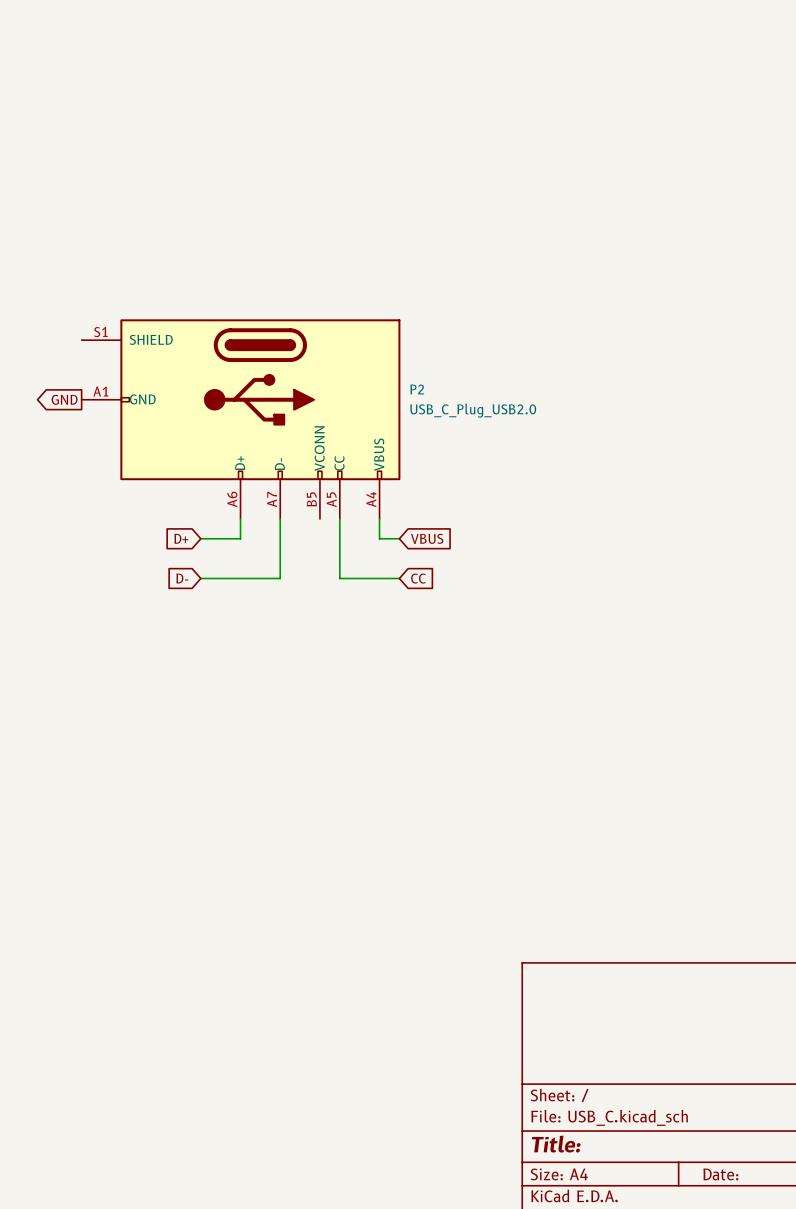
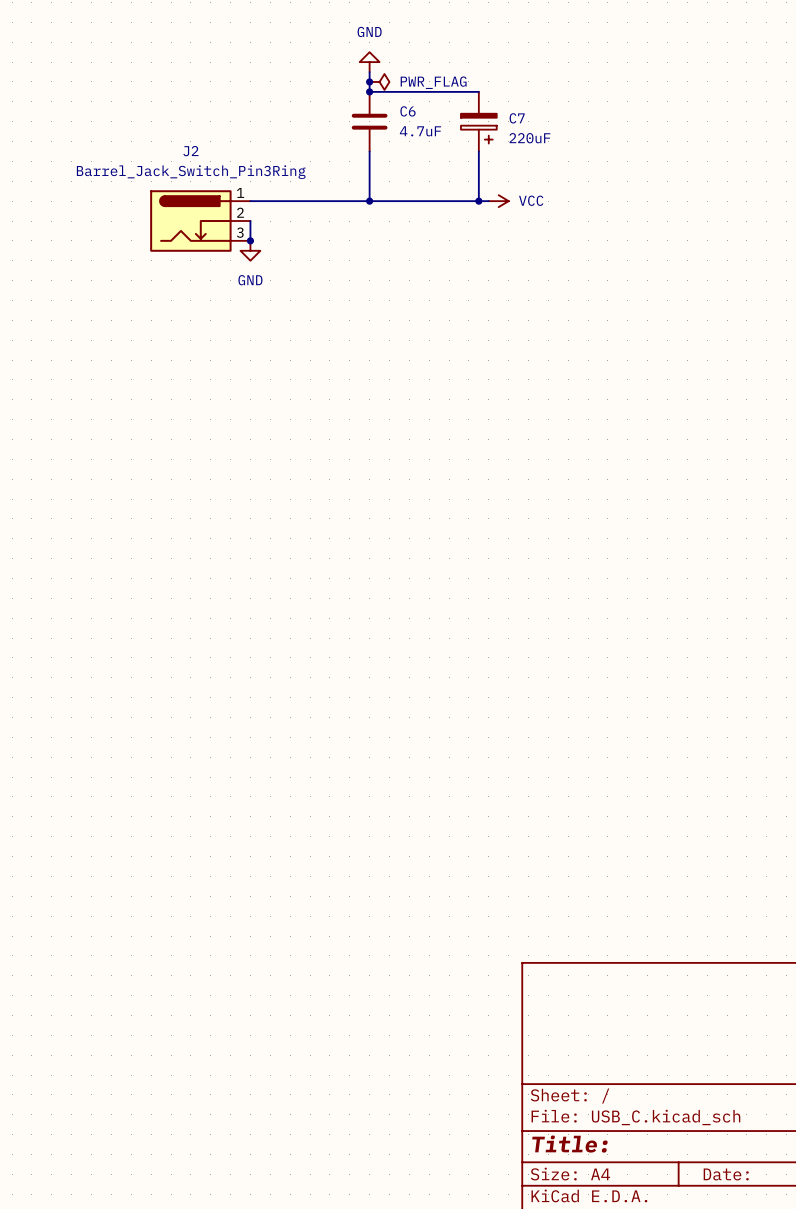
power symbol: none -> GND (369, 62)
wire: none -> (369, 72) (369, 91) (478, 91)
junction: none -> (369, 81)
power symbol: none -> PWR_FLAG (379, 81)
junction: none -> (369, 91)
C6: none -> 4.7uF (369, 121)
C7: none -> 220uF (478, 121)
wire: none -> (369, 151) (369, 201)
wire: none -> (478, 151) (478, 201)
wire: none -> (250, 201) (488, 201)
junction: none -> (369, 201)
junction: none -> (478, 201)
power symbol: none -> VCC (498, 201)
J2: none -> Barrel_Jack_Switch_Pin3Ring (200, 221)
wire: none -> (250, 221) (250, 240)
junction: none -> (250, 240)
power symbol: none -> GND (250, 250)
global label: GND (64, 399) -> none
P2: USB_C_Plug_USB2.0 (241, 419) -> none
wire: (240, 518) (240, 538) (200, 538) -> none
wire: (280, 518) (280, 578) (200, 578) -> none
wire: (339, 518) (339, 578) (399, 578) -> none
wire: (379, 518) (379, 538) (399, 538) -> none
global label: D+ (181, 538) -> none
global label: VBUS (427, 538) -> none
global label: D- (182, 578) -> none
global label: CC (418, 578) -> none

